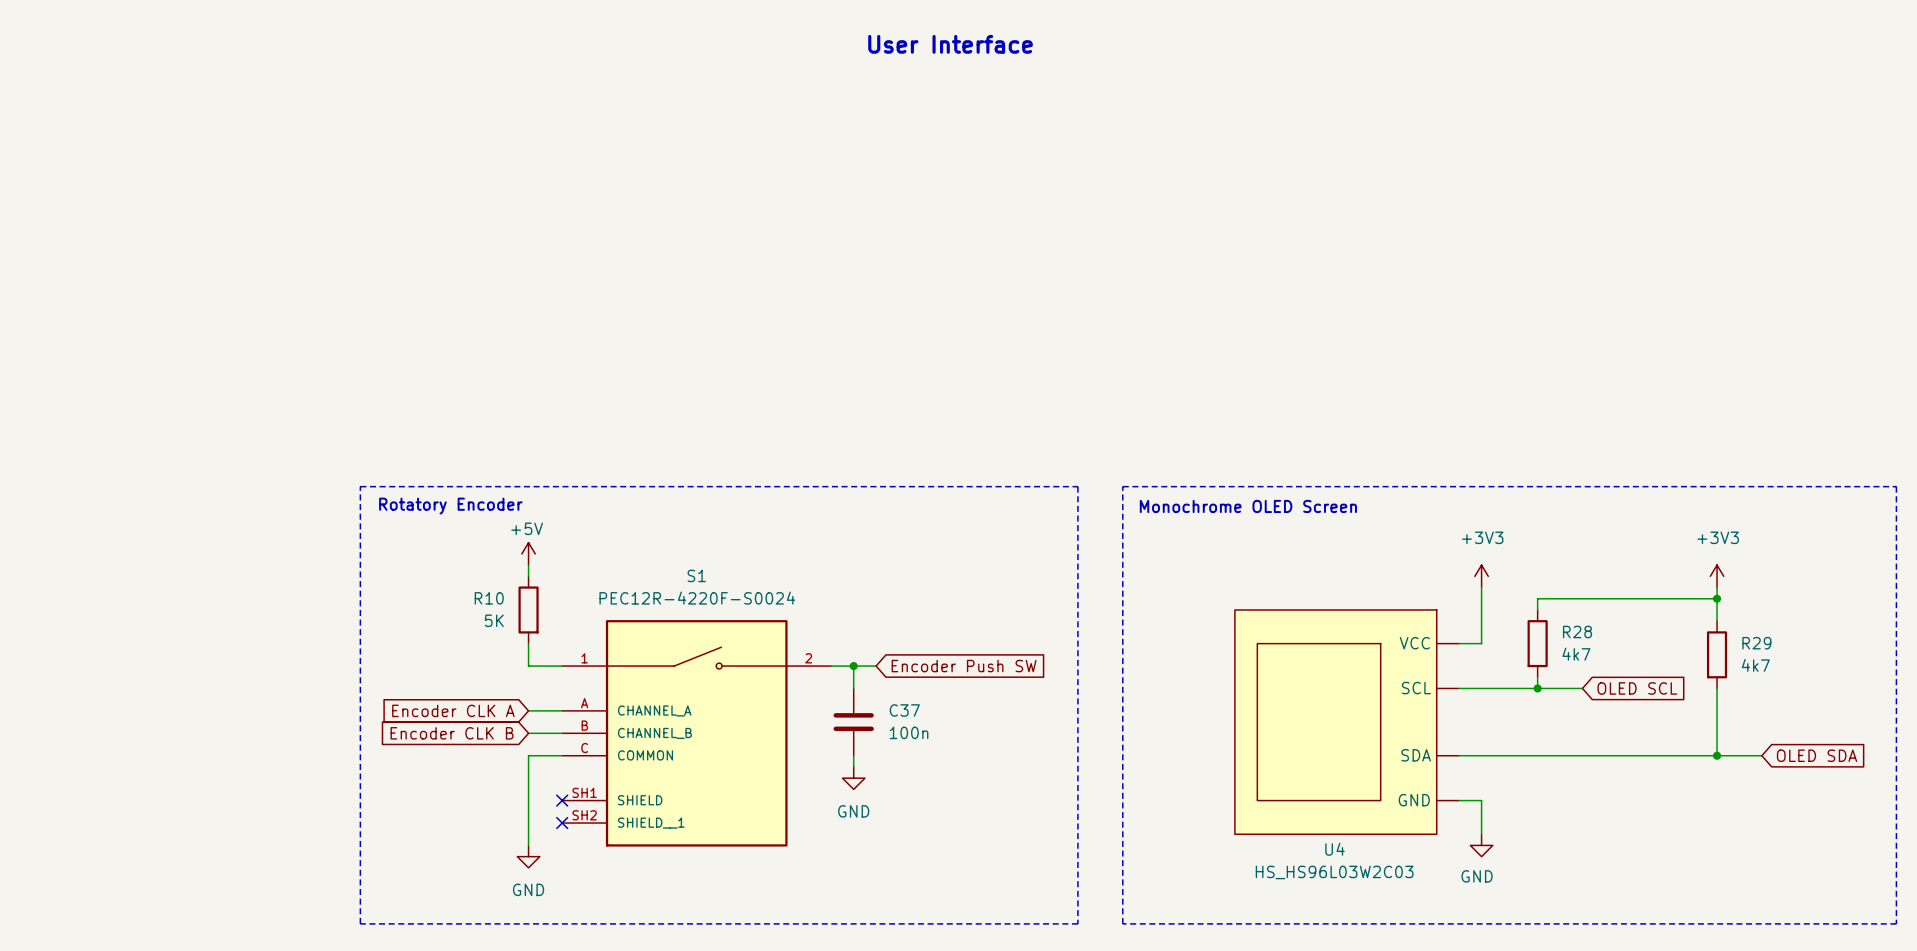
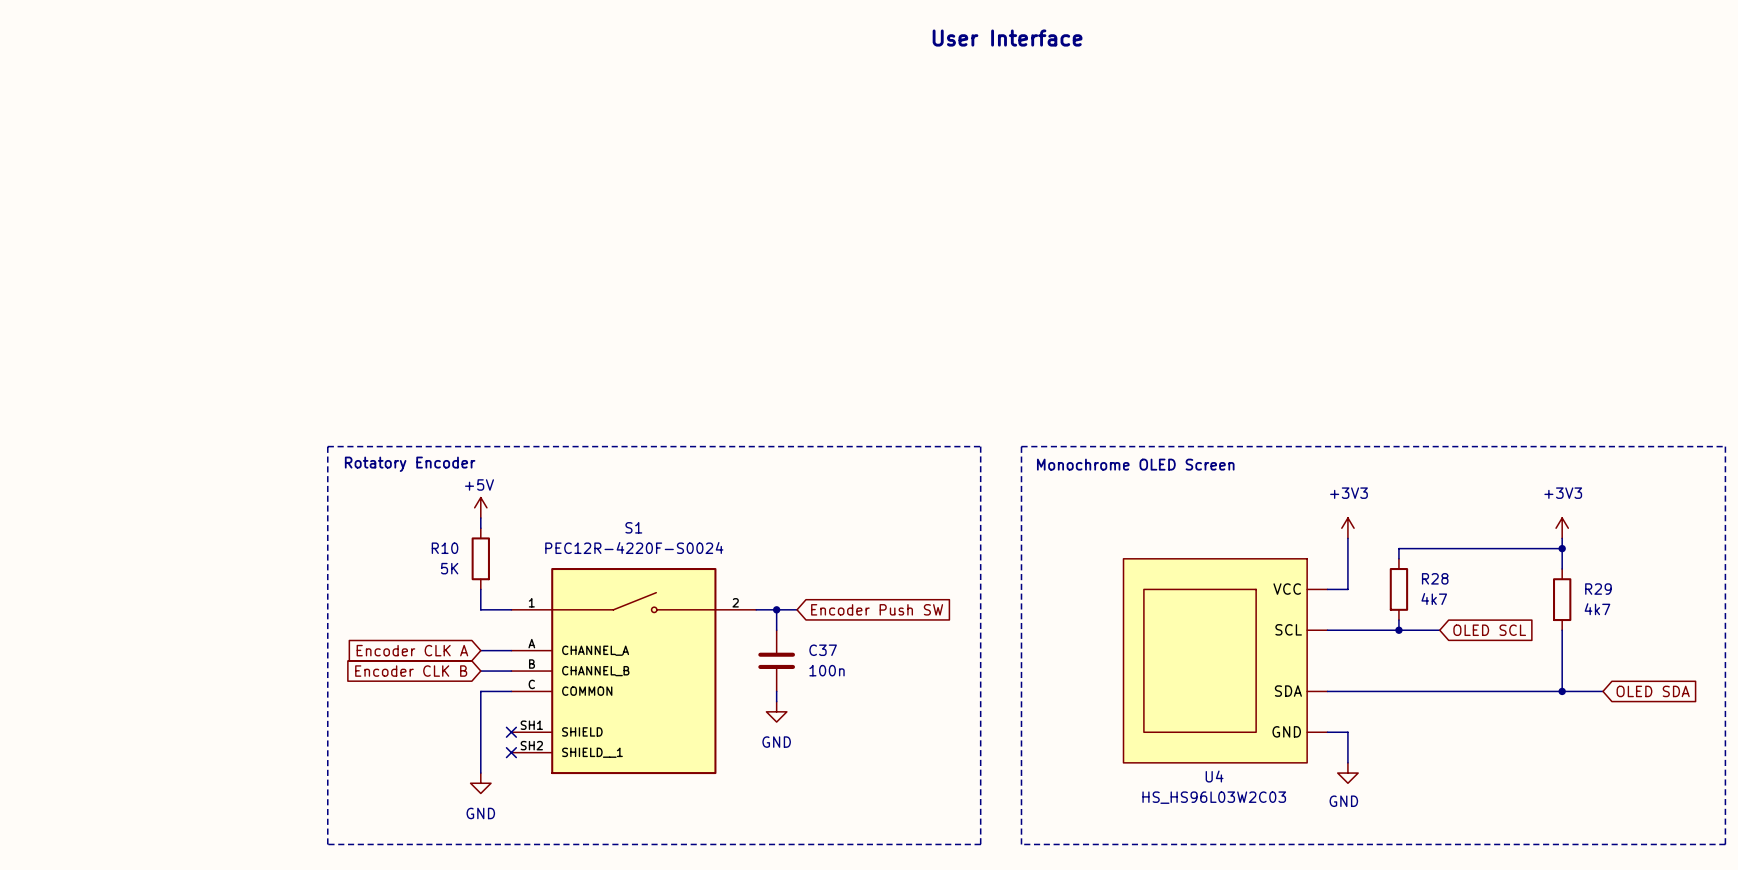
text position: User Interface (950, 44) -> User Interface (1007, 38)

